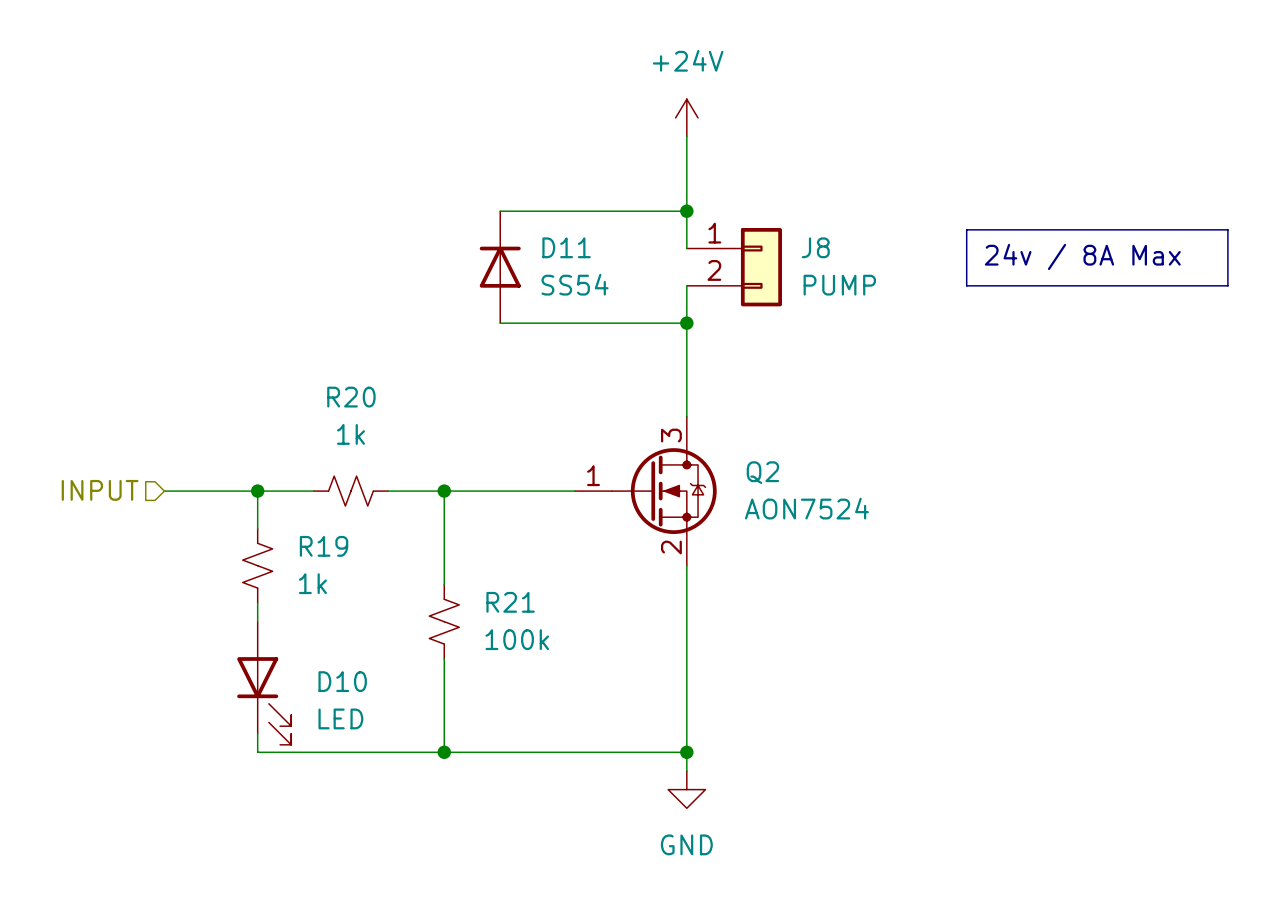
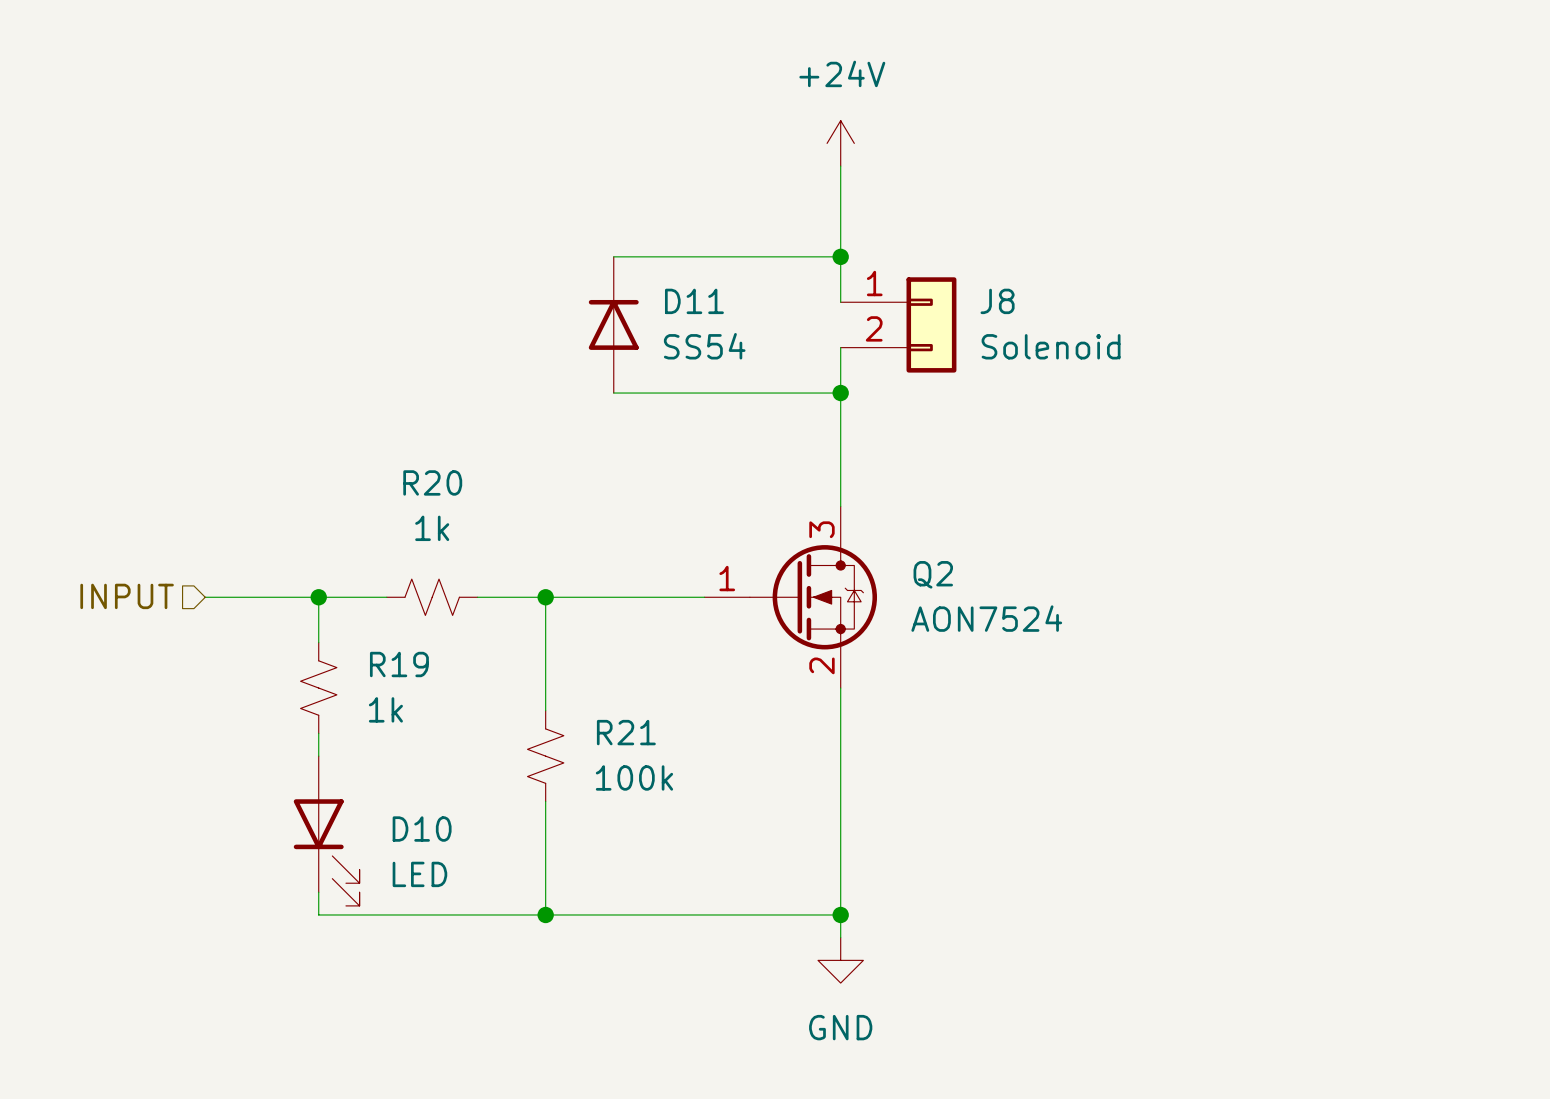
line: (966, 229) (1227, 229) (1227, 285) (966, 285) (966, 229) -> none
text: 24v / 8A Max (1082, 256) -> none
J8 value: PUMP (839, 285) -> Solenoid (1051, 346)

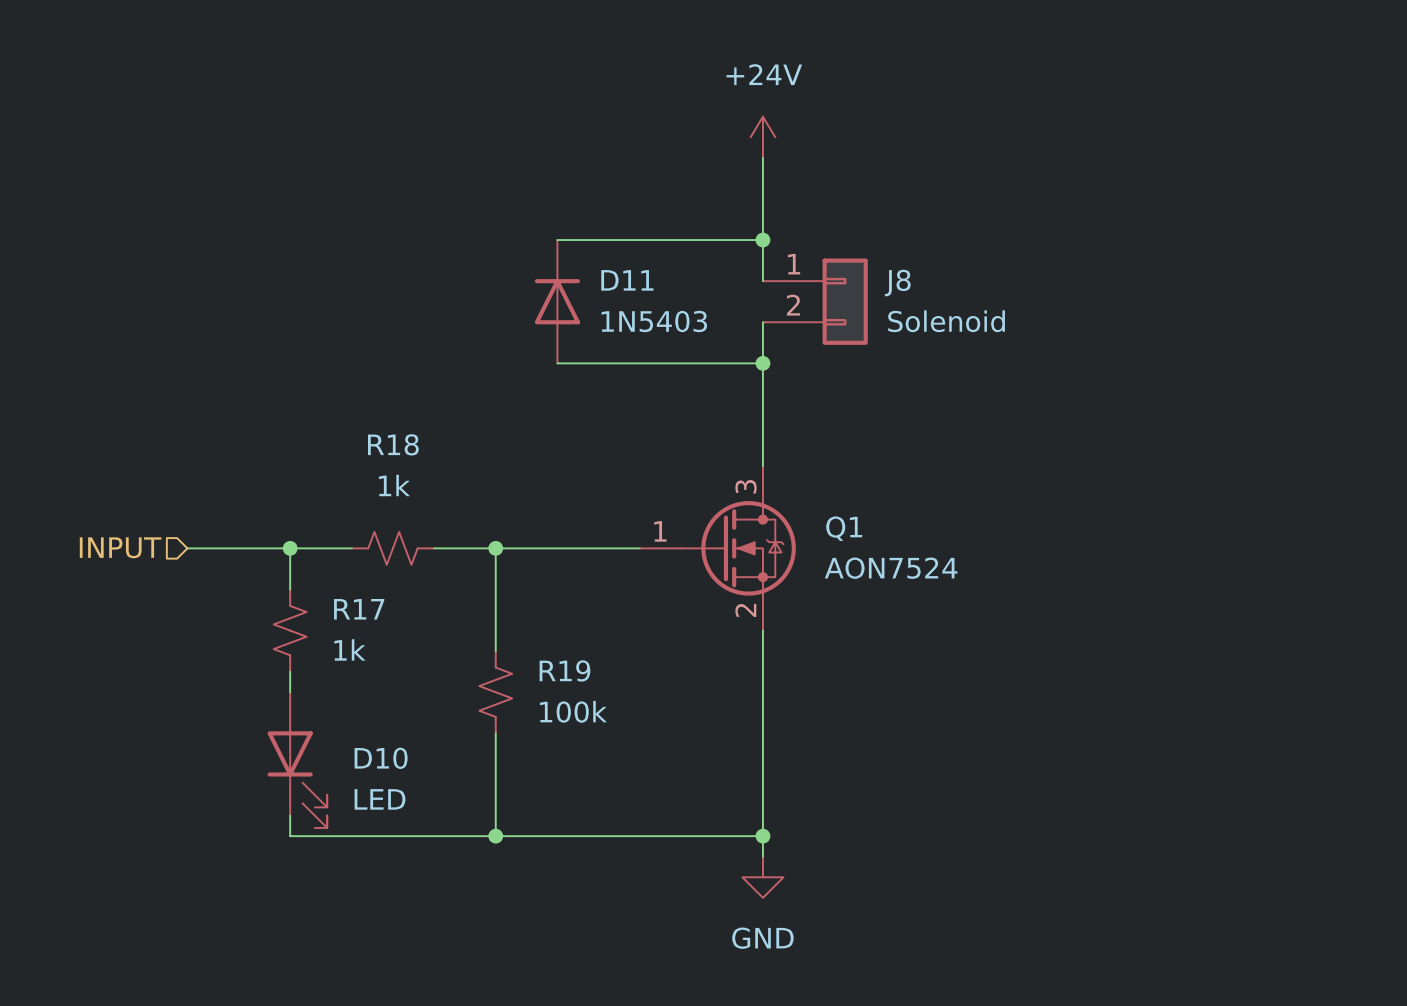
D11 value: SS54 (704, 346) -> 1N5403 (654, 321)
R20 name: R20 (432, 482) -> R18 (393, 444)
Q2 name: Q2 (933, 574) -> Q1 (844, 528)
R19 name: R19 (399, 664) -> R17 (359, 609)
R21 name: R21 (626, 732) -> R19 (564, 670)

